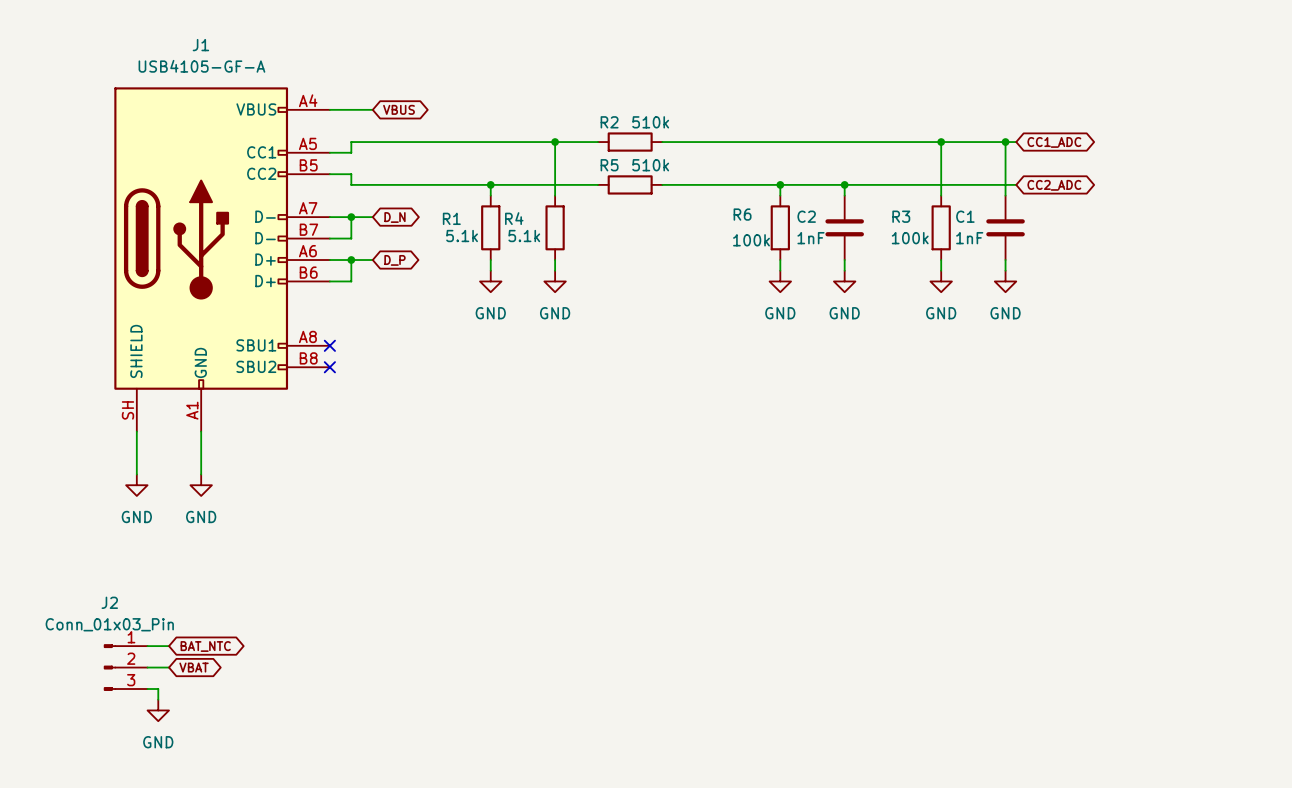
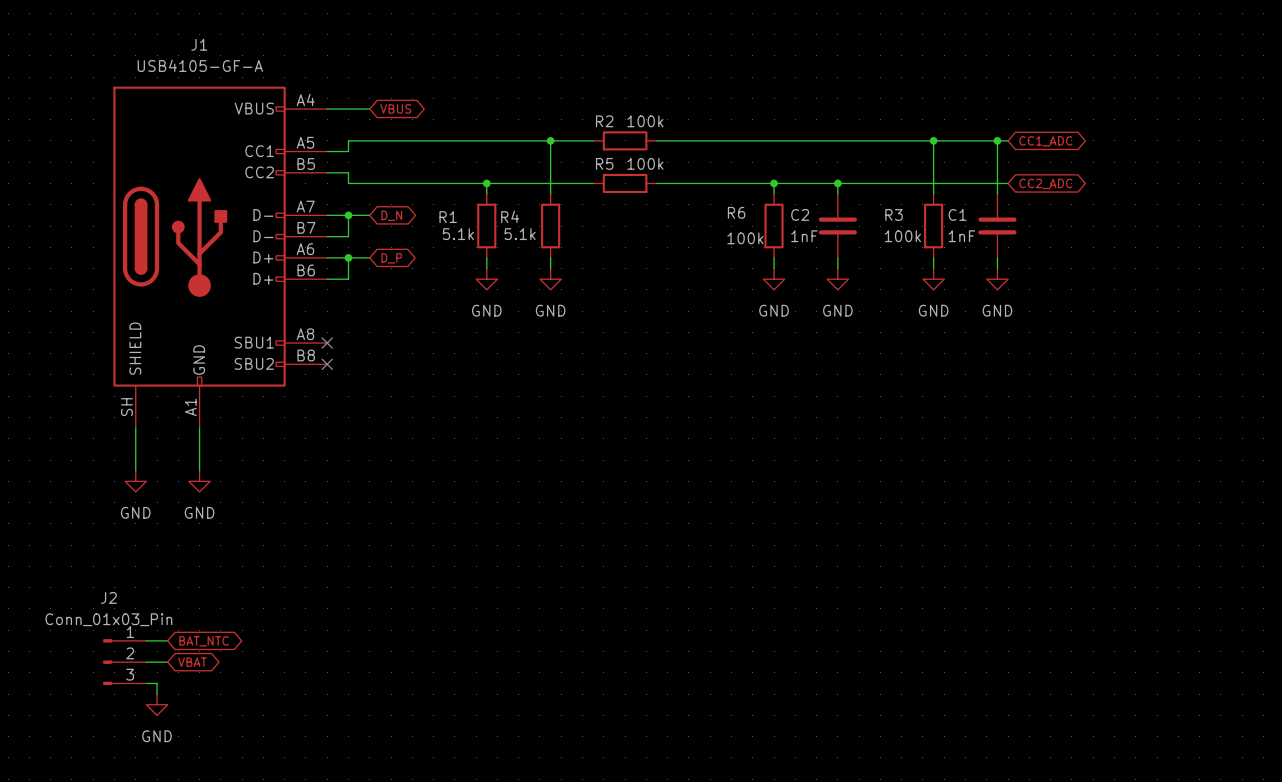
R2 value: 510k (650, 122) -> 100k (645, 121)
R5 value: 510k (650, 165) -> 100k (645, 163)

